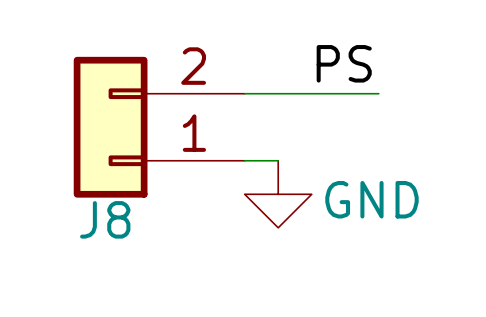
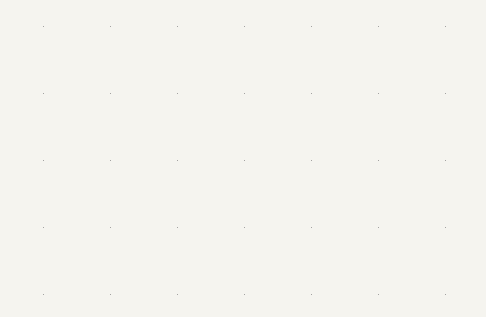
label: PS (344, 63) -> none
wire: (244, 93) (378, 93) -> none
J8: (159, 127) -> none
wire: (244, 160) (278, 160) -> none
power symbol: GND (278, 194) -> none

